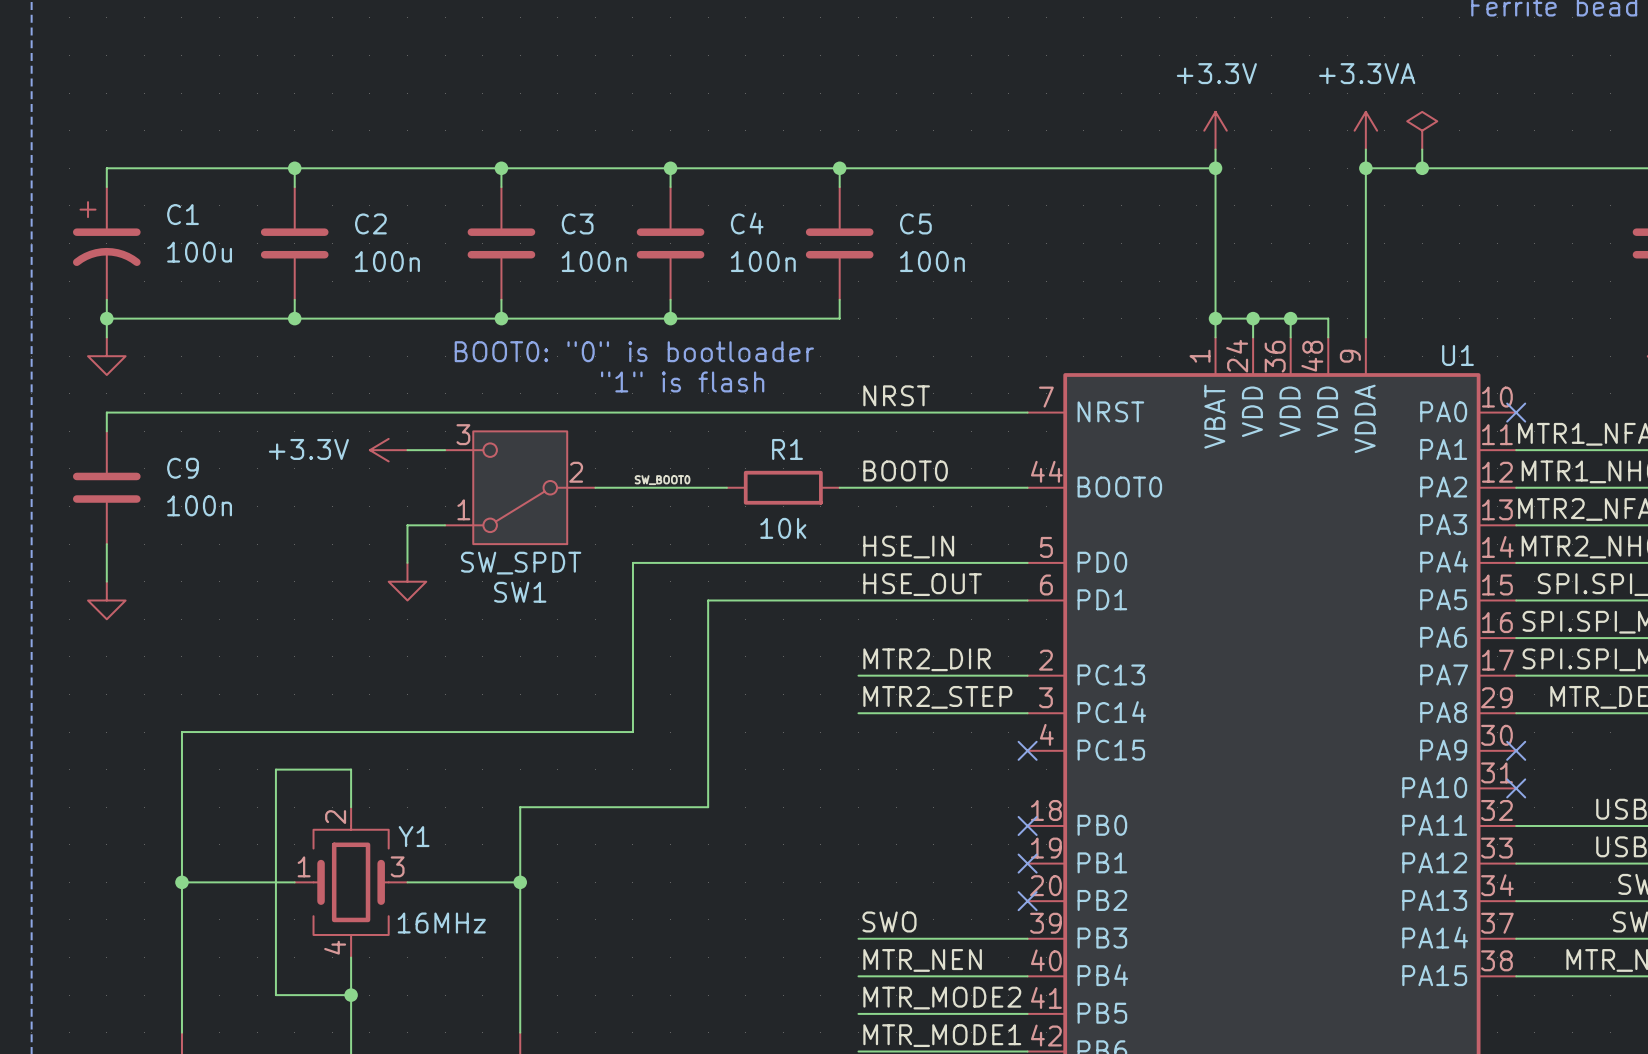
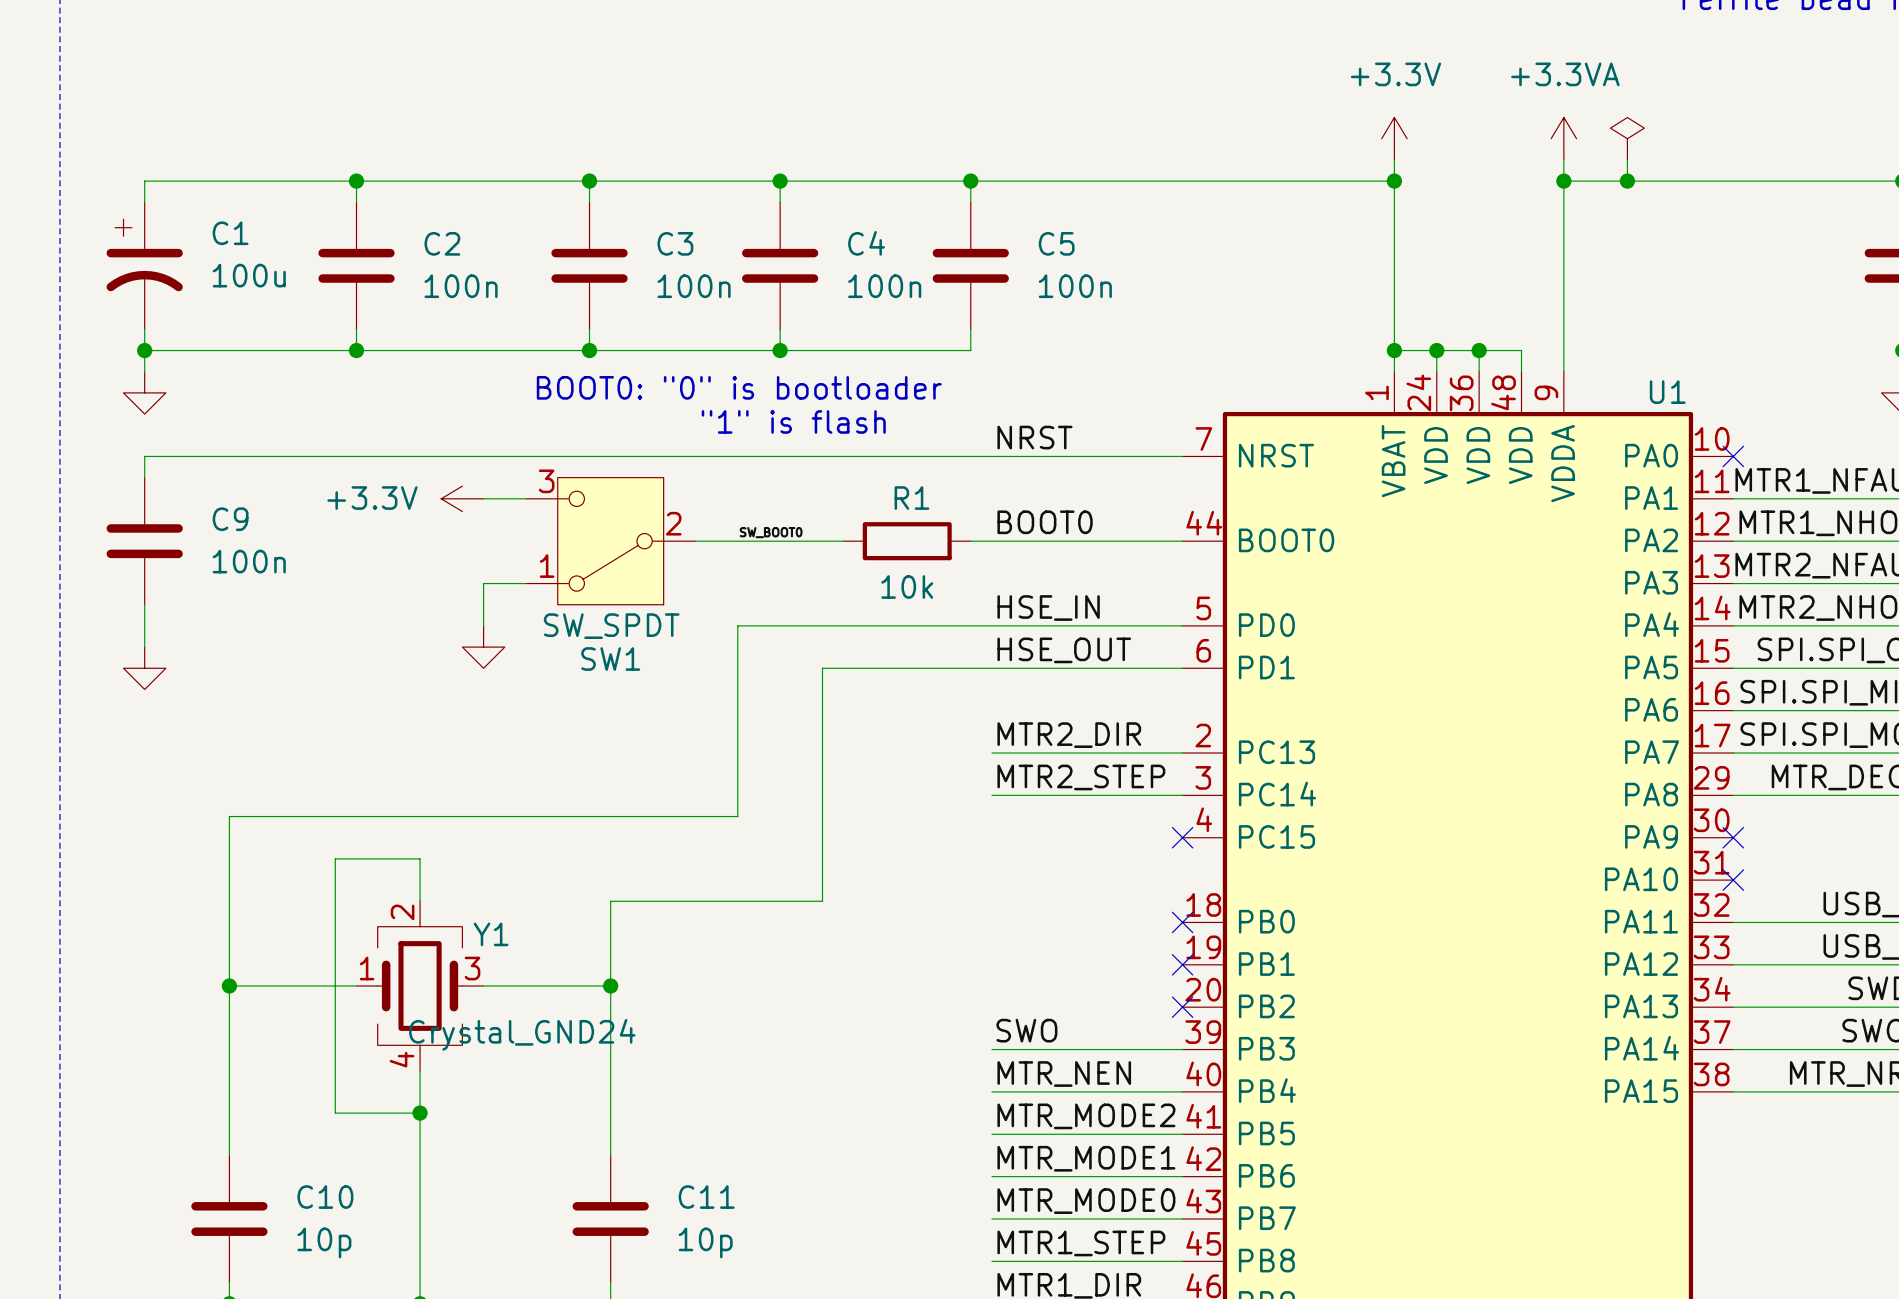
Y1 value: 16MHz (441, 923) -> Crystal_GND24 (522, 1034)

